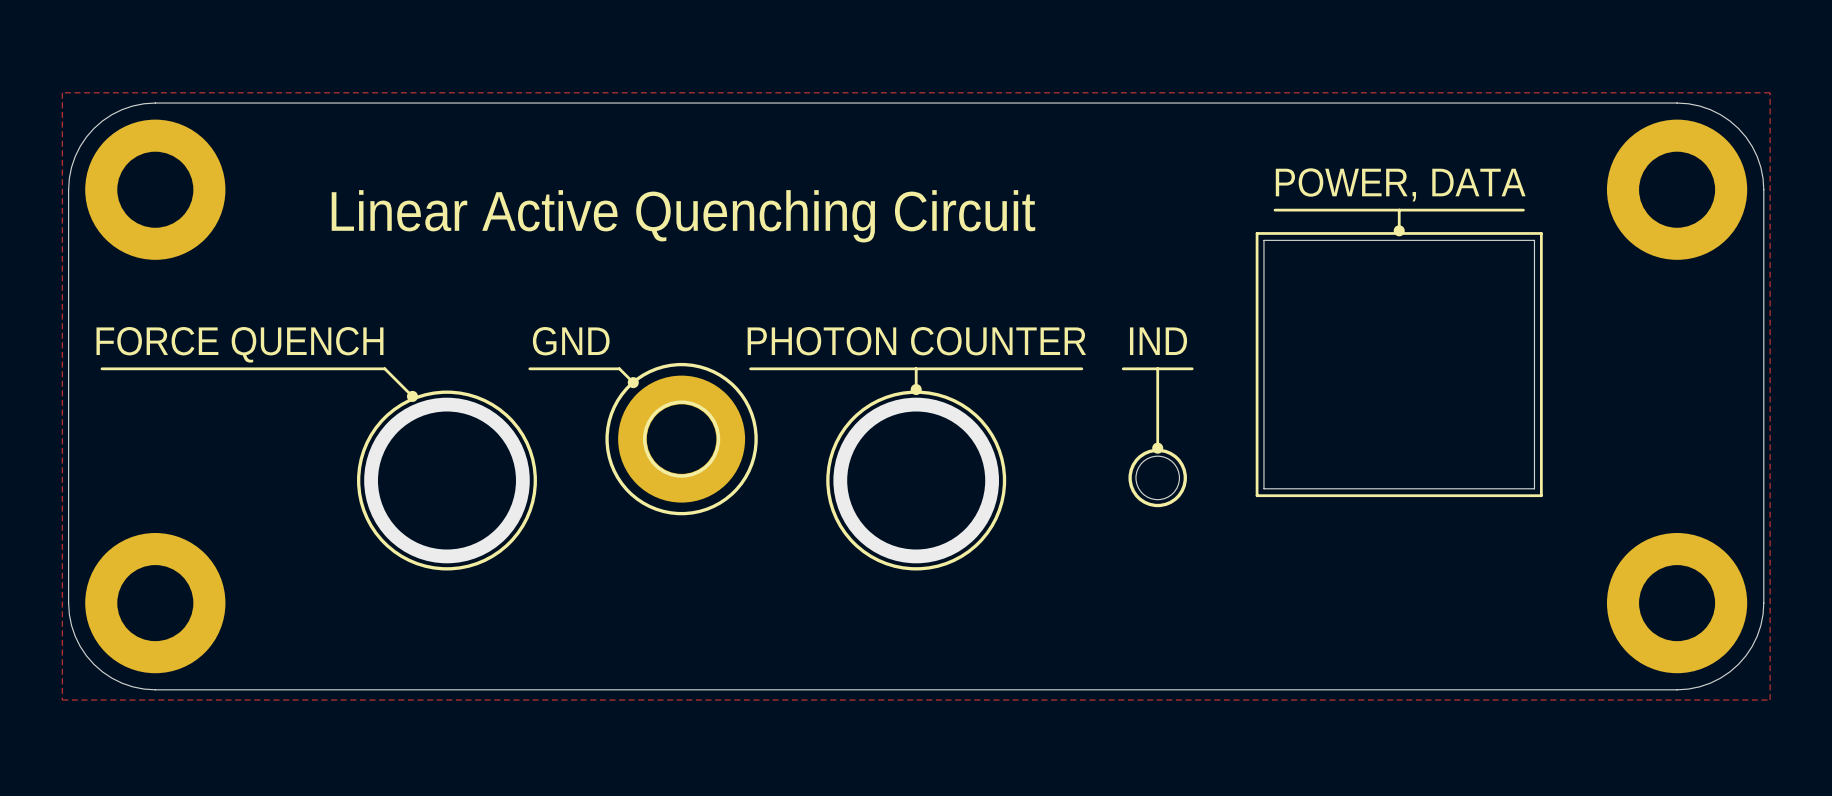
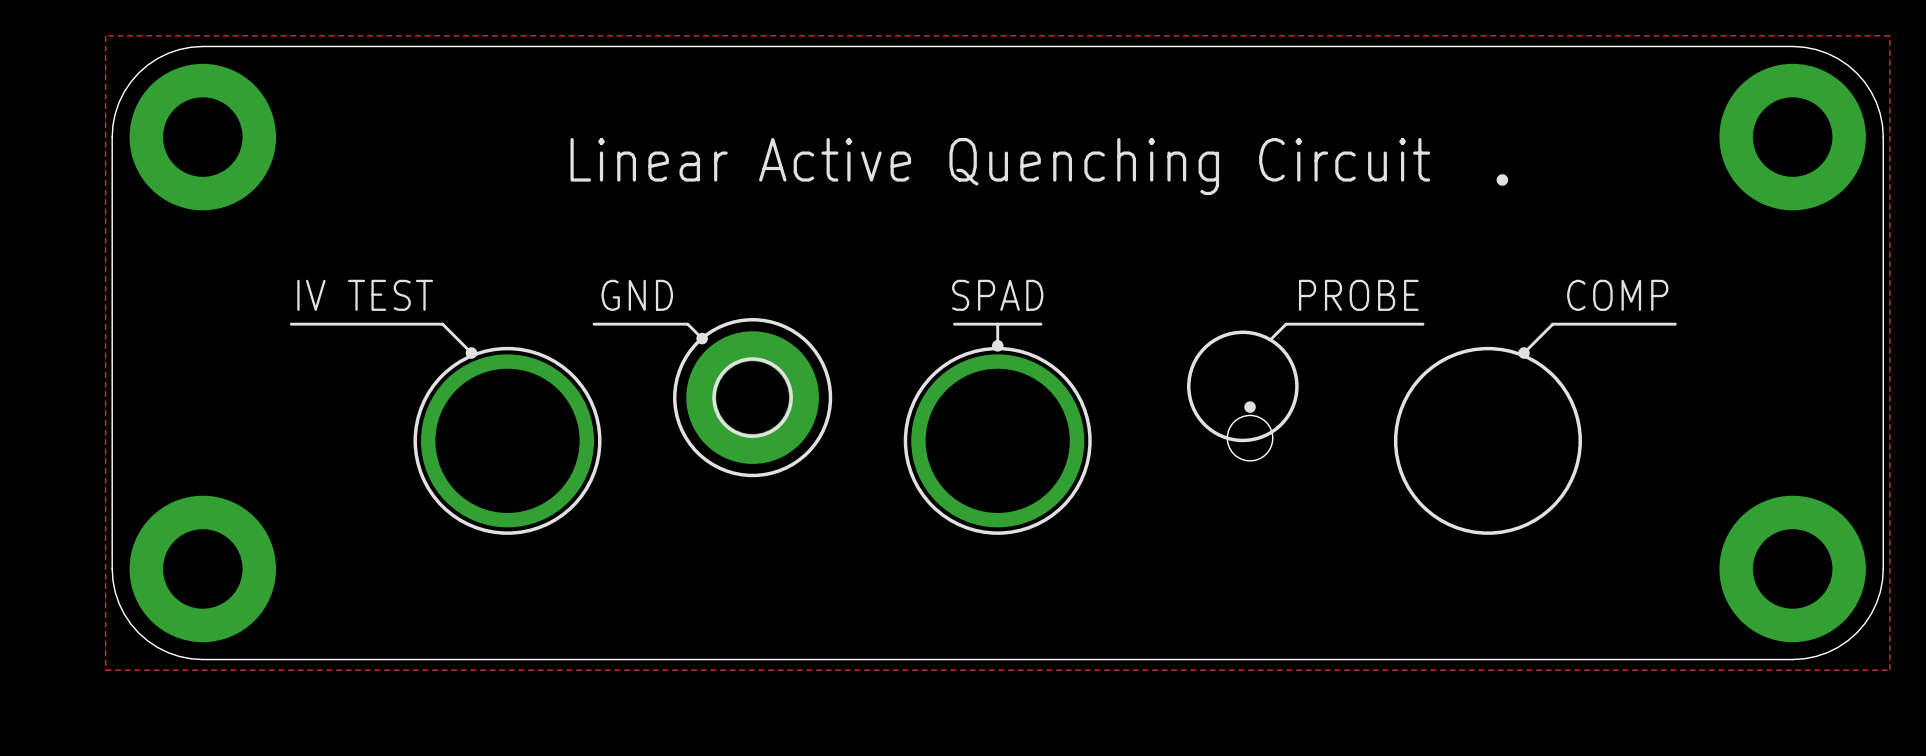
text: POWER, DATA (1400, 184) -> none
line: (1275, 210) (1523, 210) -> none
line: (1399, 210) (1399, 230) -> none
text position: Linear Active Quenching Circuit (683, 216) -> Linear Active Quenching Circuit (1000, 166)
line: (1257, 233) (1257, 495) (1541, 495) (1541, 233) (1257, 233) -> none
board edge: (1263, 240) (1263, 488) (1534, 488) (1534, 240) (1263, 240) -> none
text: none -> IV TEST (365, 295)
text: PHOTON COUNTER (916, 341) -> SPAD (997, 295)
text: IND (1158, 341) -> none
text: none -> PROBE (1358, 295)
text: none -> COMP (1617, 295)
text: FORCE QUENCH (239, 344) -> none
line: (101, 368) (239, 368) -> none
line: (750, 368) (874, 368) -> none
line: (957, 368) (1081, 368) -> none
line: (1123, 368) (1192, 368) -> none
line: (1157, 368) (1157, 451) -> none
line: none -> (1423, 324) (1286, 324) (1271, 338)
line: none -> (1675, 324) (1552, 324) (1523, 353)
drawing: none -> [1187, 330, 1299, 443]
drawing: none -> [1393, 346, 1582, 535]
drawing: [1128, 448, 1187, 508] -> none

